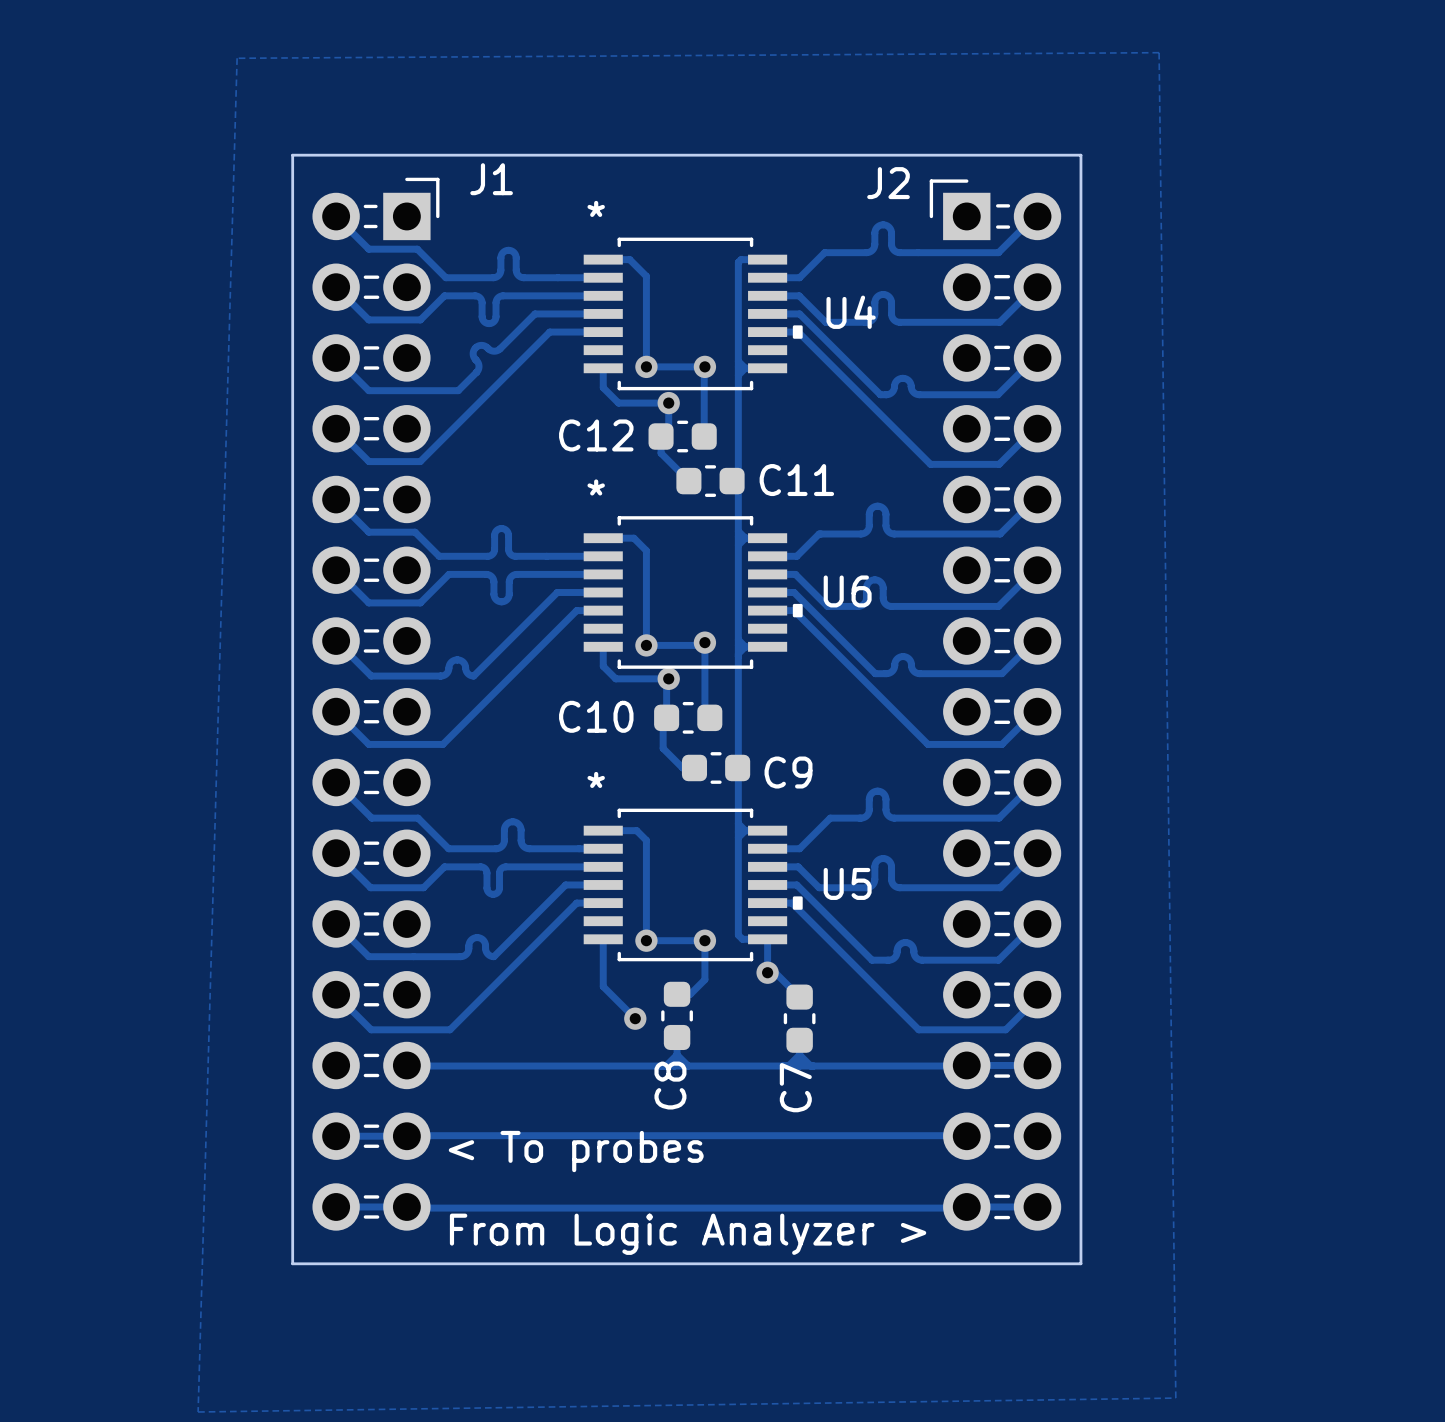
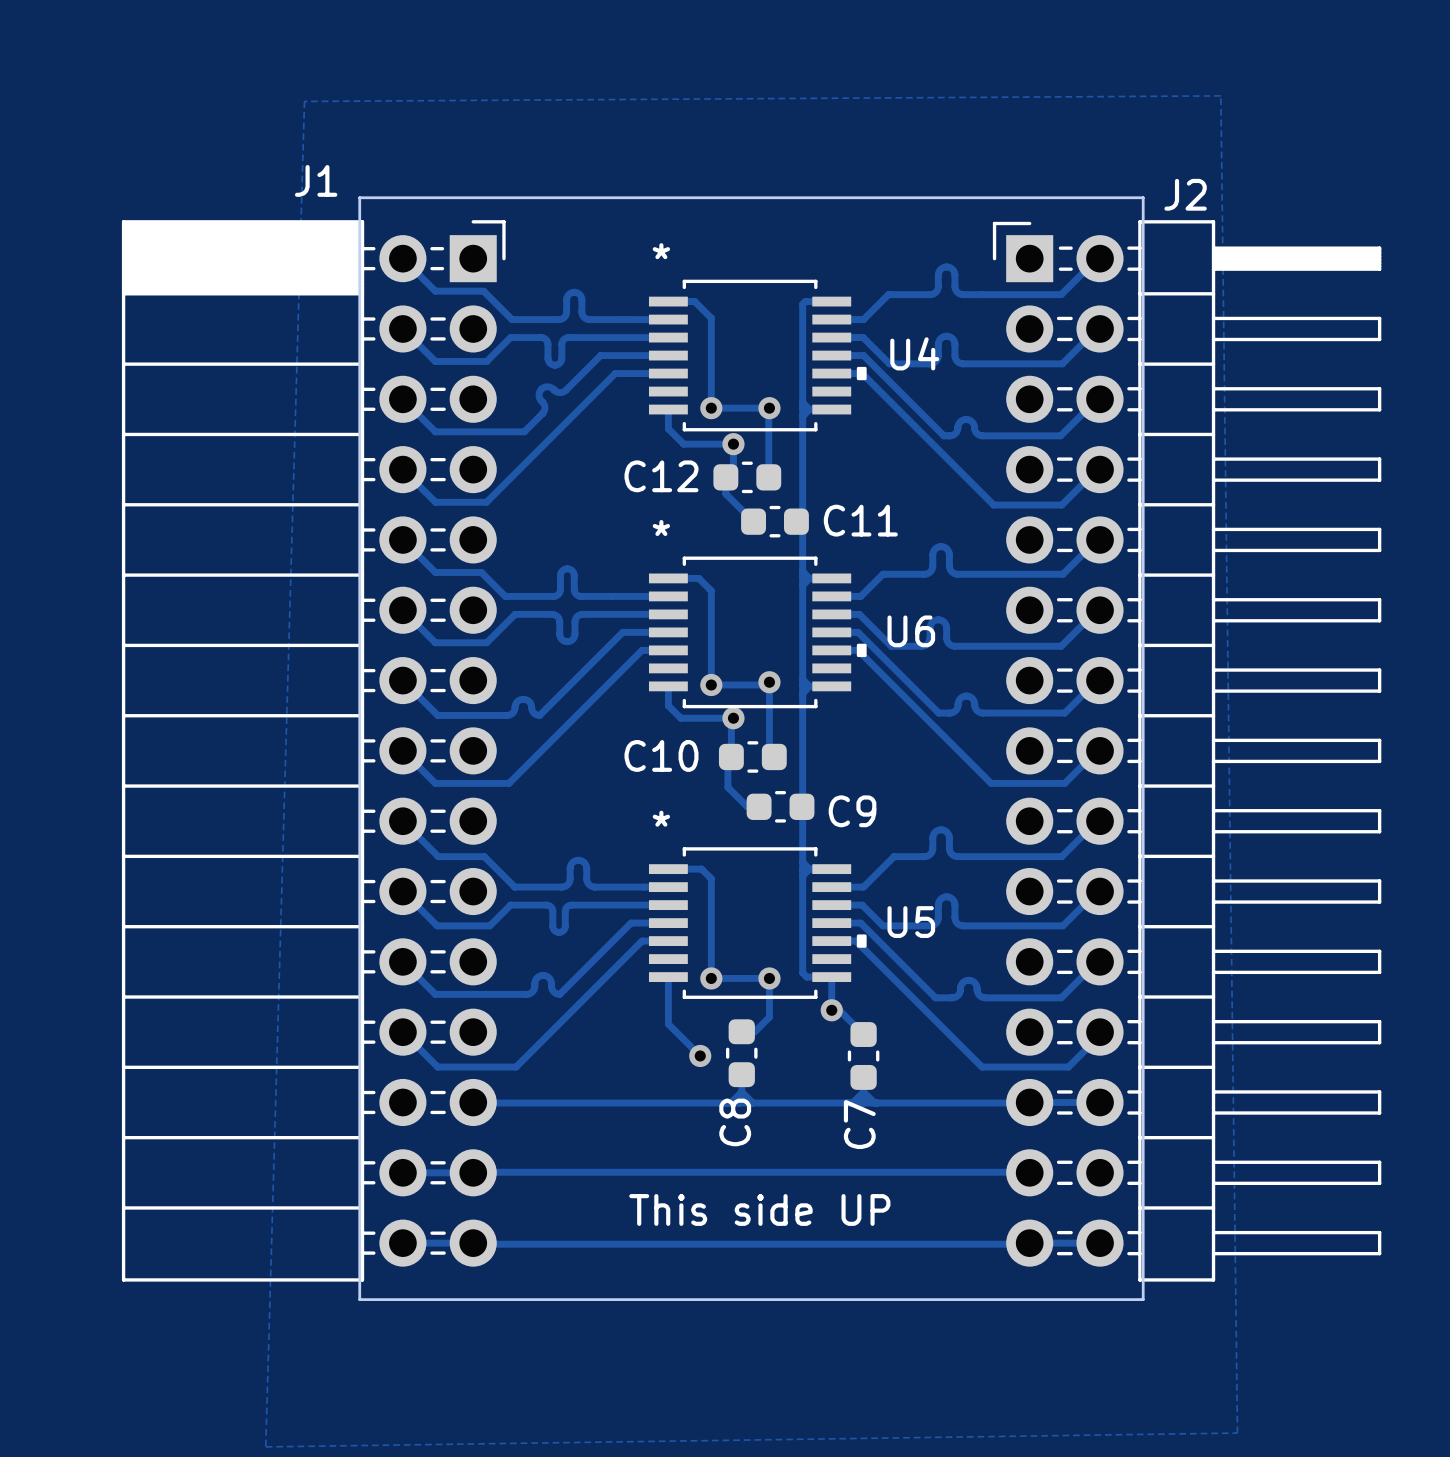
J1 footprint: [312, 177, 440, 1231] -> [121, 220, 506, 1282]
J1 name position: J1 (491, 179) -> J1 (316, 180)
J2 footprint: [929, 179, 1062, 1231] -> [992, 220, 1382, 1282]
J2 name position: J2 (888, 183) -> J2 (1185, 194)
text: < To probes (576, 1151) -> none
text: none -> This side UP (759, 1209)
text: From Logic Analyzer > (688, 1234) -> none

